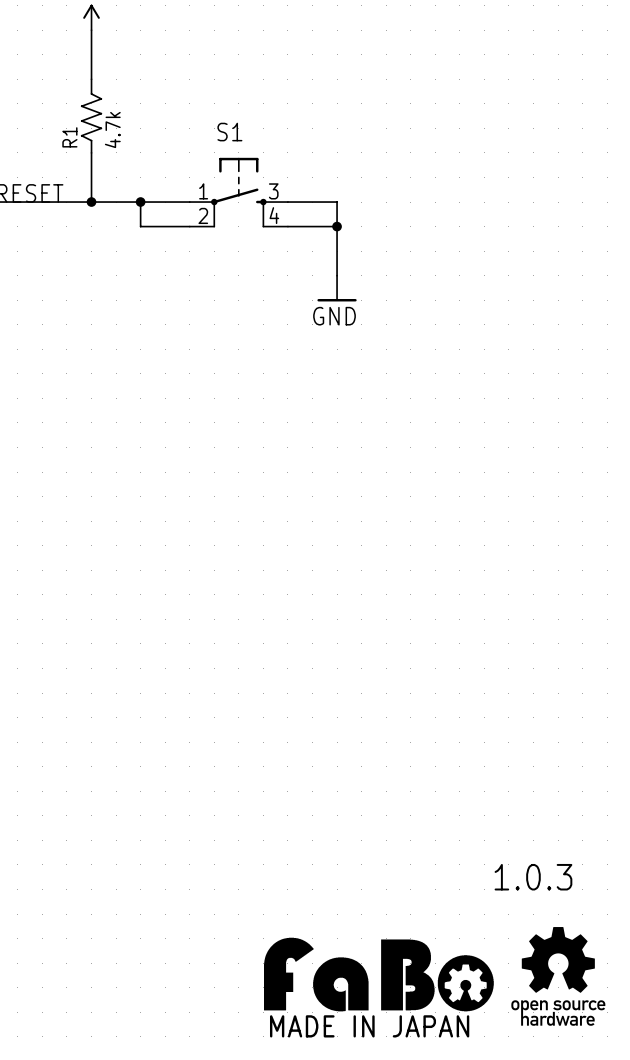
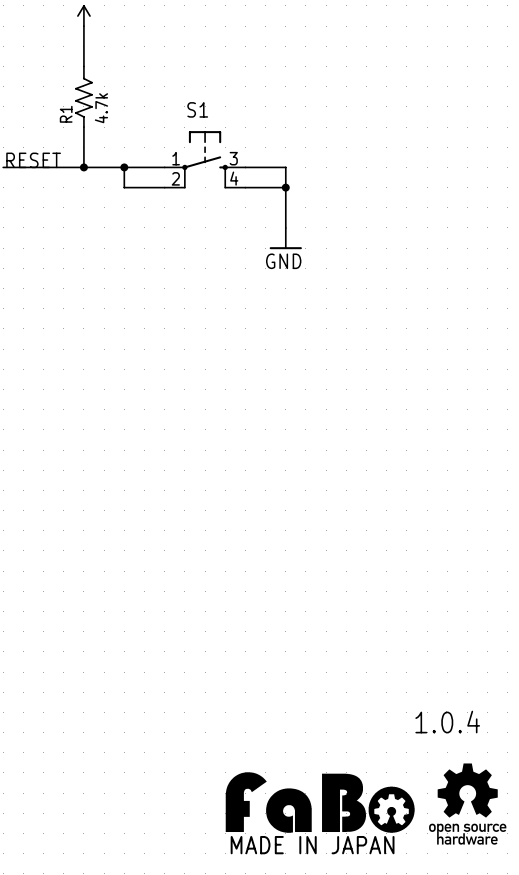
text: 1.0.3 (533, 877) -> 1.0.4 (447, 722)

